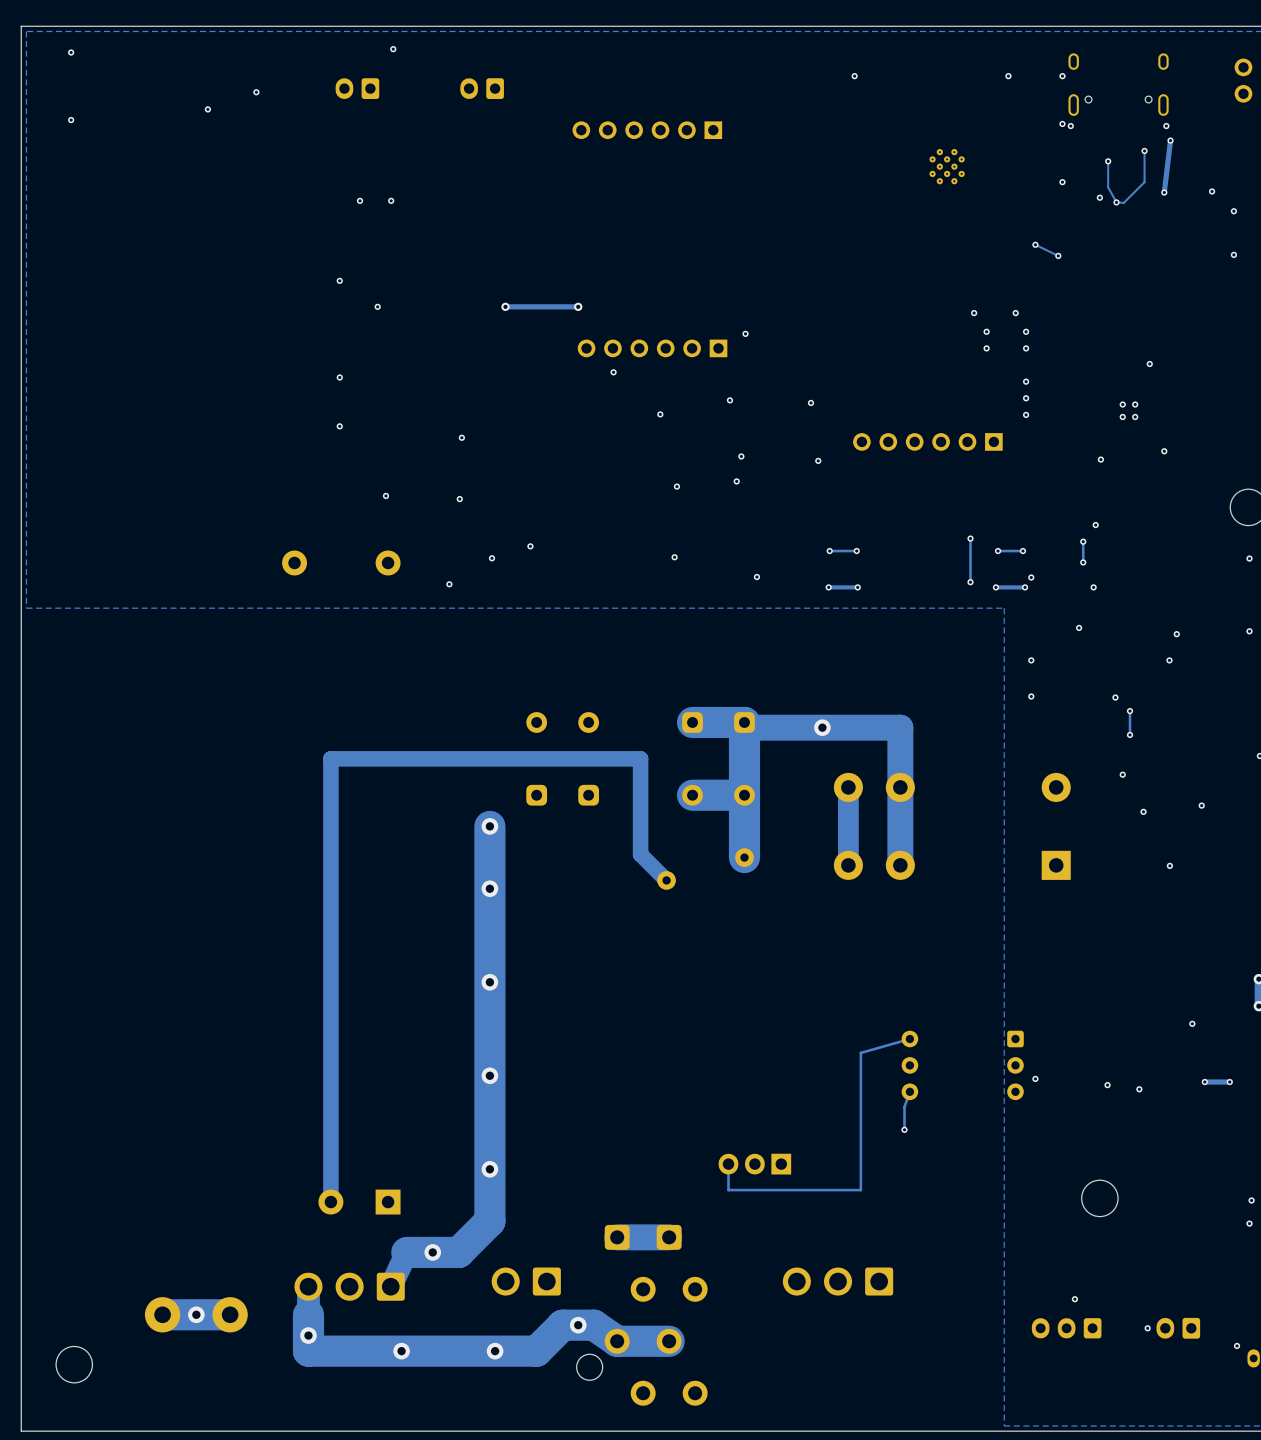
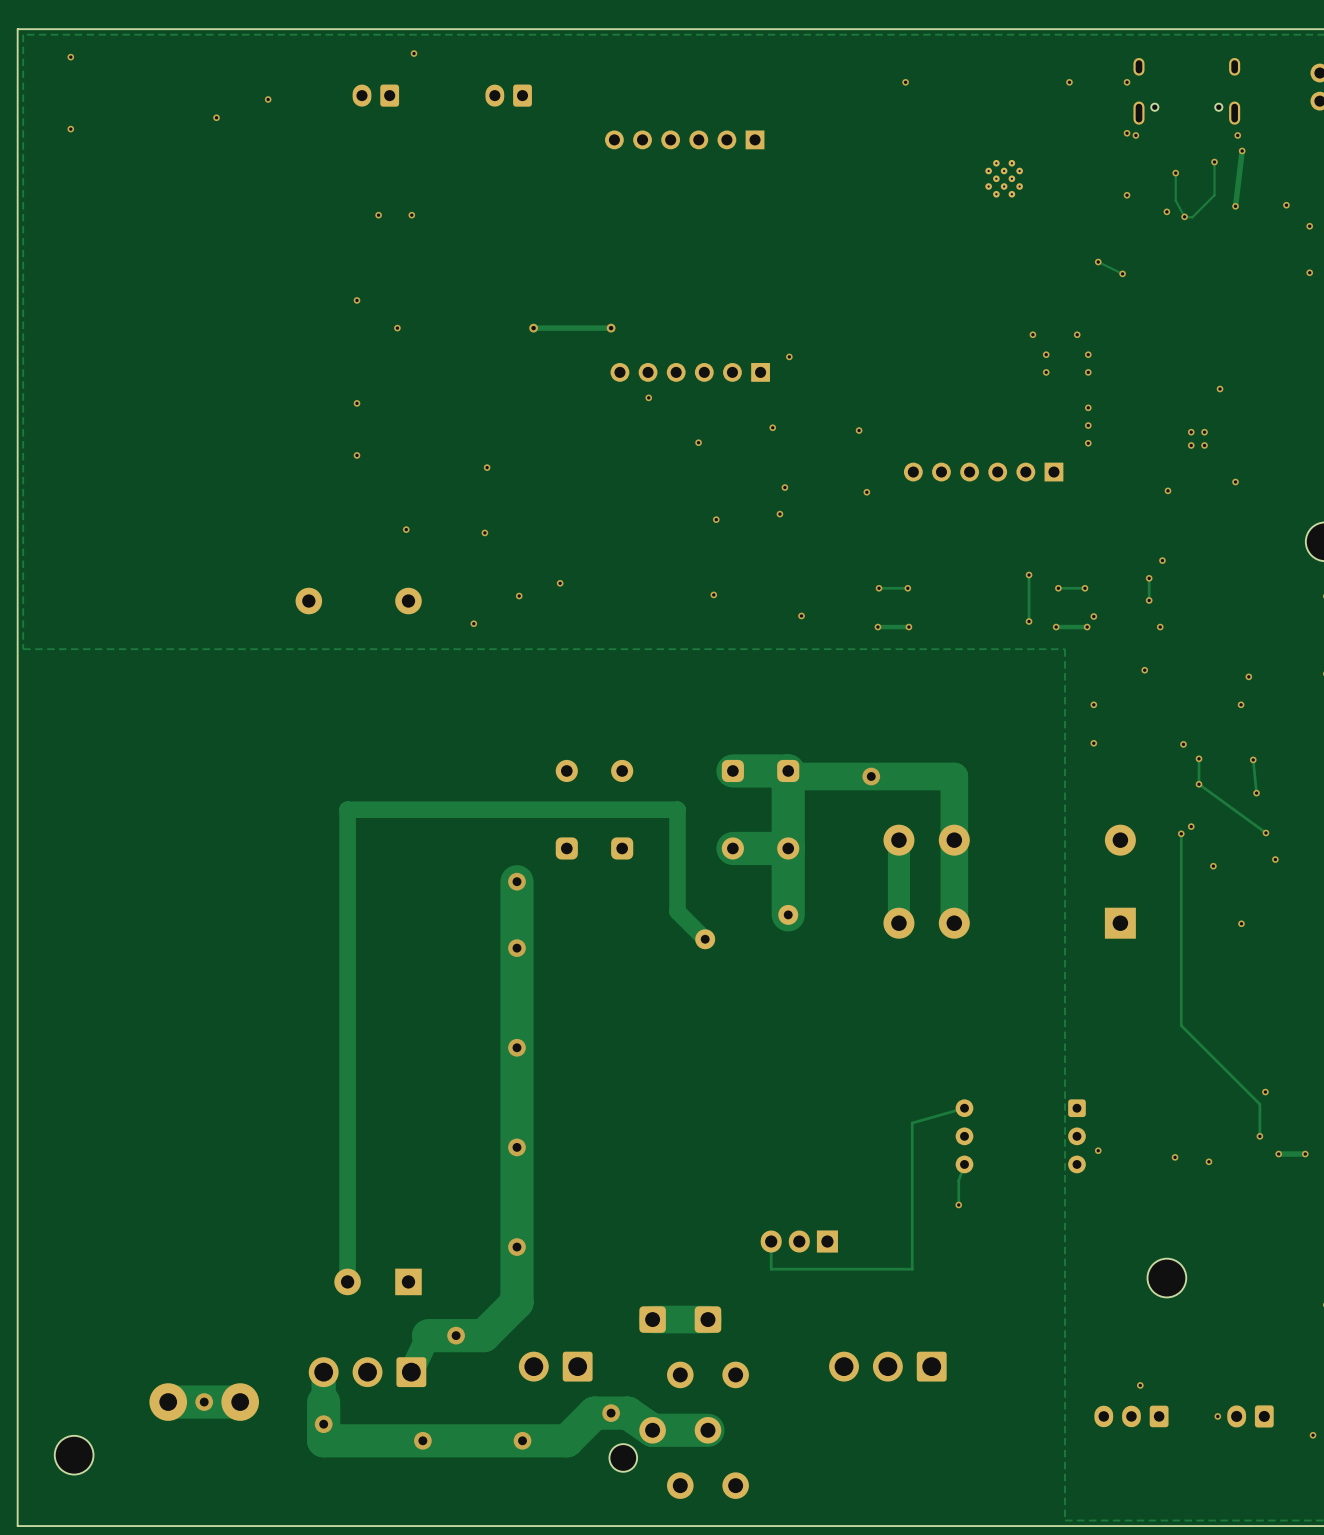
track: none -> (1253, 759) (1256, 793)
via: none -> (1253, 759)
track: none -> (1198, 784) (1265, 832)
via: none -> (1256, 793)
via: none -> (1265, 832)
track: none -> (1181, 833) (1181, 1025) (1259, 1104) (1259, 1136)
via: none -> (1181, 833)
via: none -> (1259, 1136)

